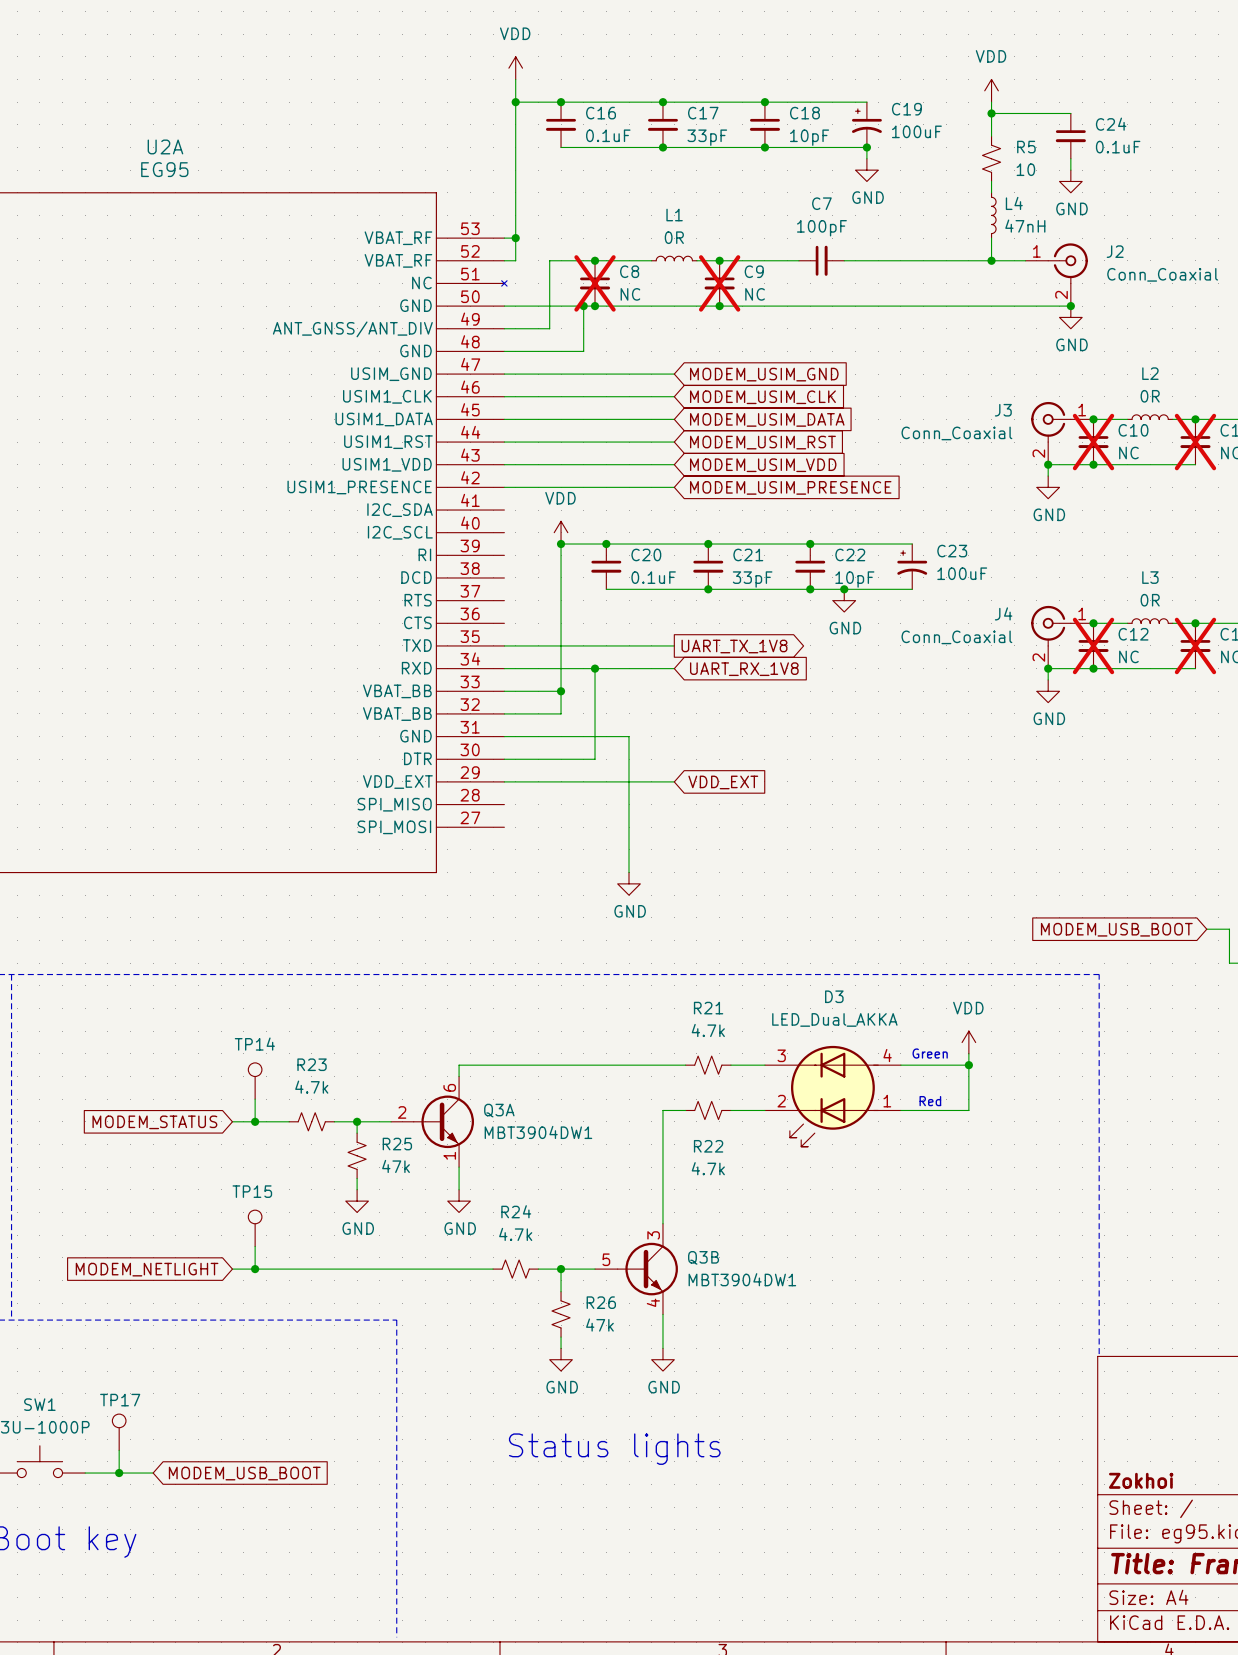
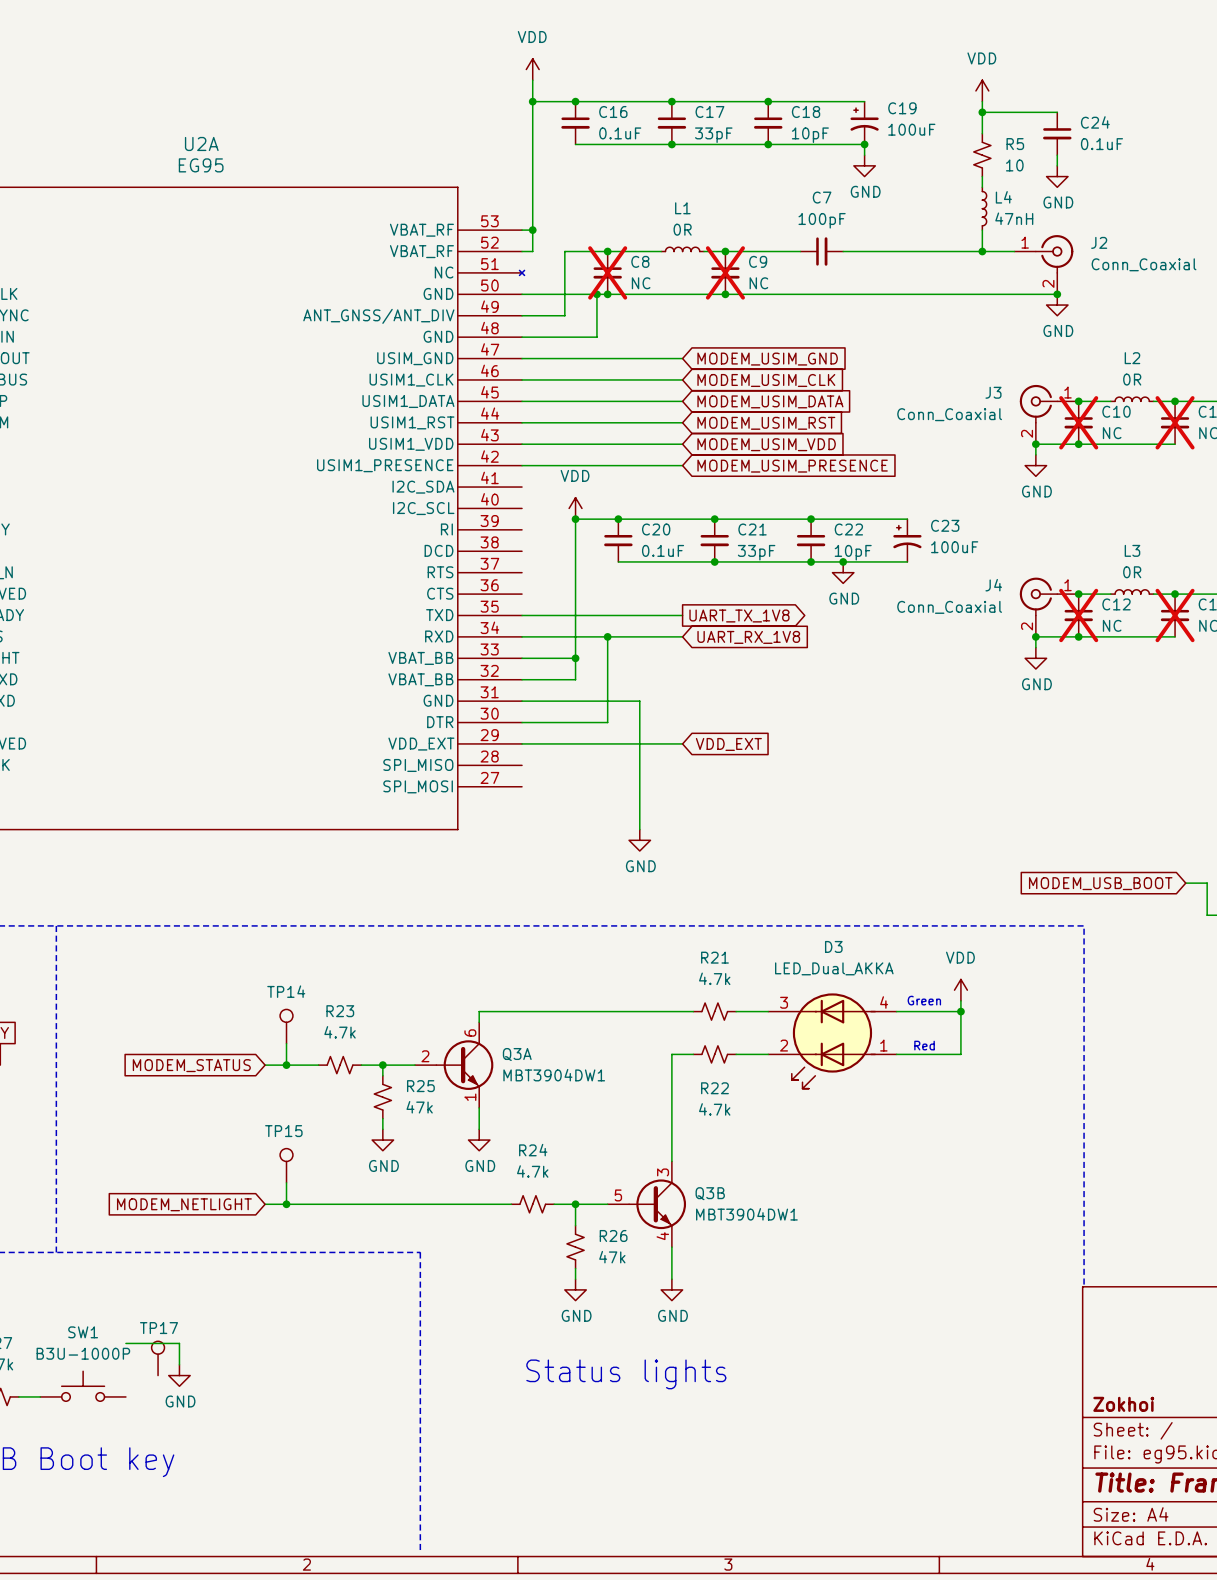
wire: none -> (125, 1343) (179, 1343) (179, 1364)
wire: (119, 1450) (119, 1473) -> none
power symbol: none -> GND (179, 1375)
wire: (85, 1473) (153, 1473) -> none
junction: (119, 1473) -> none
global label: MODEM_USB_BOOT (244, 1473) -> none

